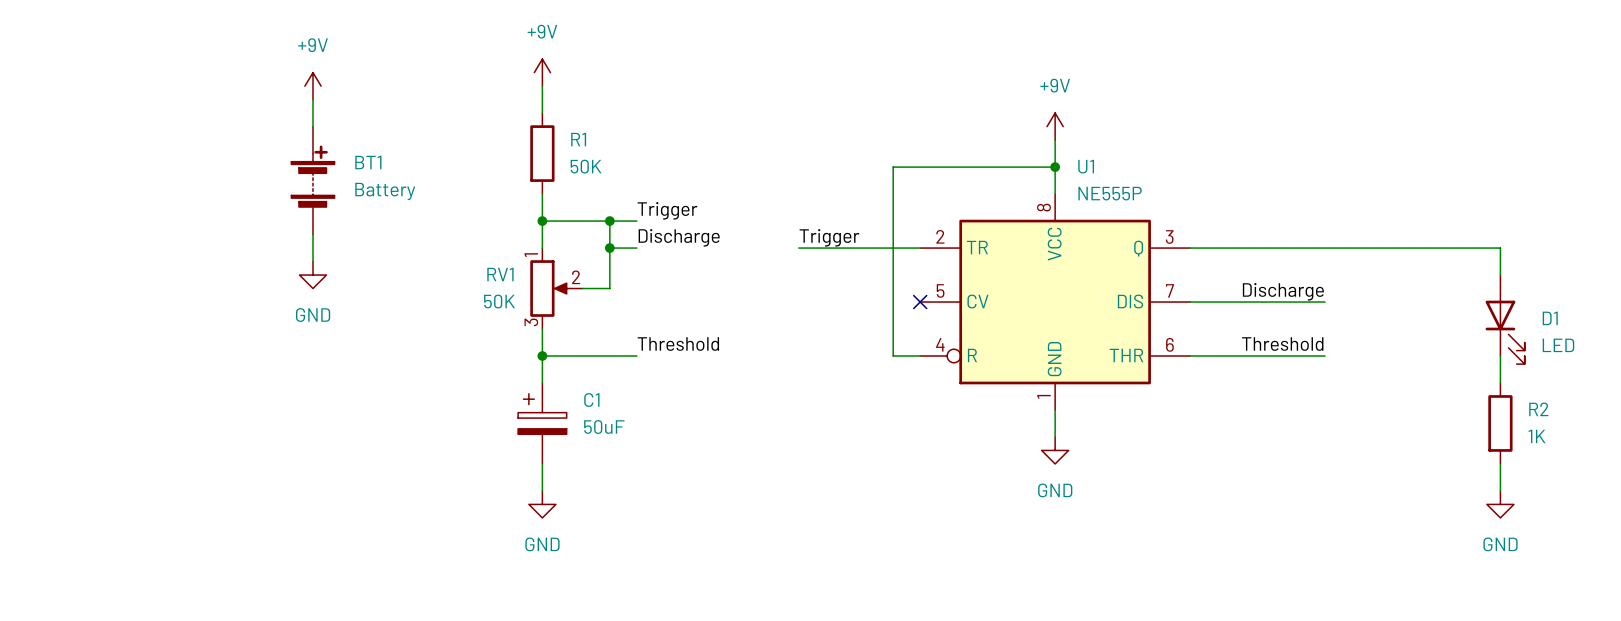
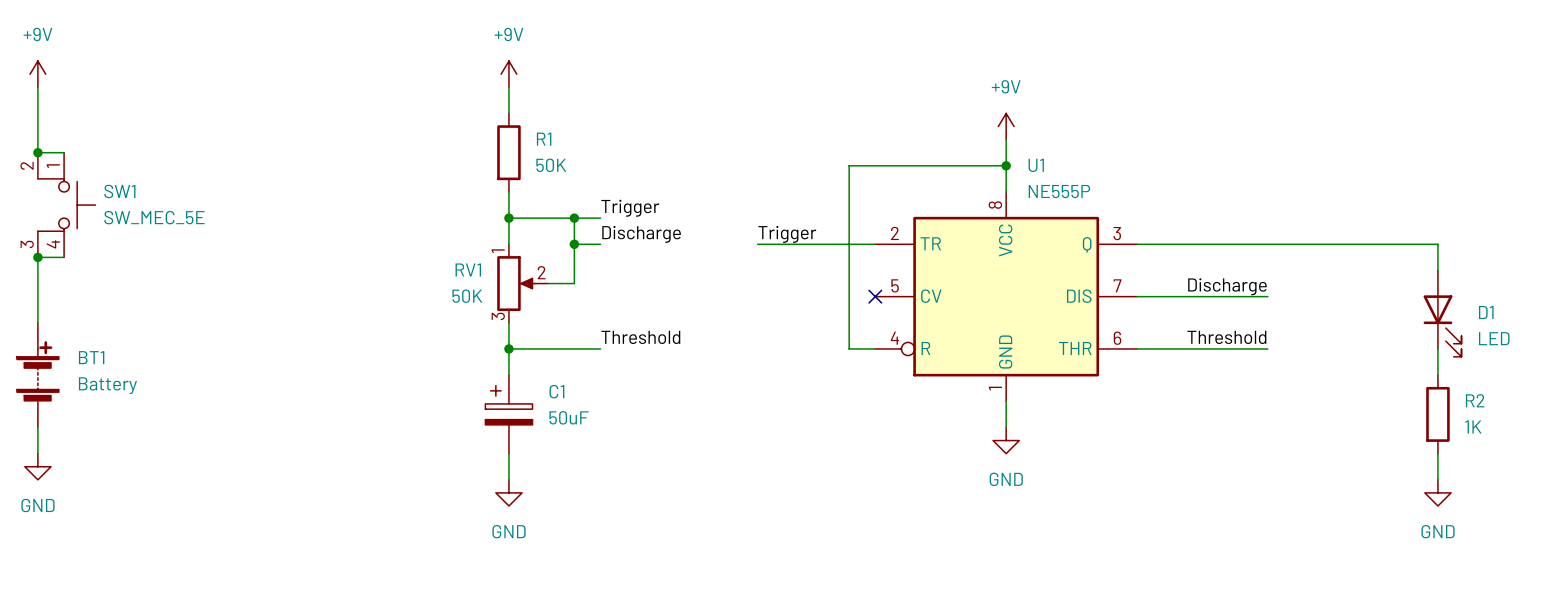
wire: none -> (37, 87) (37, 152) (64, 152)
power symbol position: +9V (312, 86) -> +9V (37, 74)
wire: (312, 99) (312, 126) -> none
junction: none -> (37, 152)
BT1 position: (312, 180) -> (37, 375)
SW1: none -> SW_MEC_5E (66, 205)
wire: (312, 234) (312, 261) -> none
junction: none -> (37, 257)
wire: none -> (64, 257) (37, 257) (37, 322)
power symbol: GND (312, 275) -> none
wire: none -> (37, 427) (37, 453)
power symbol: none -> GND (37, 466)

